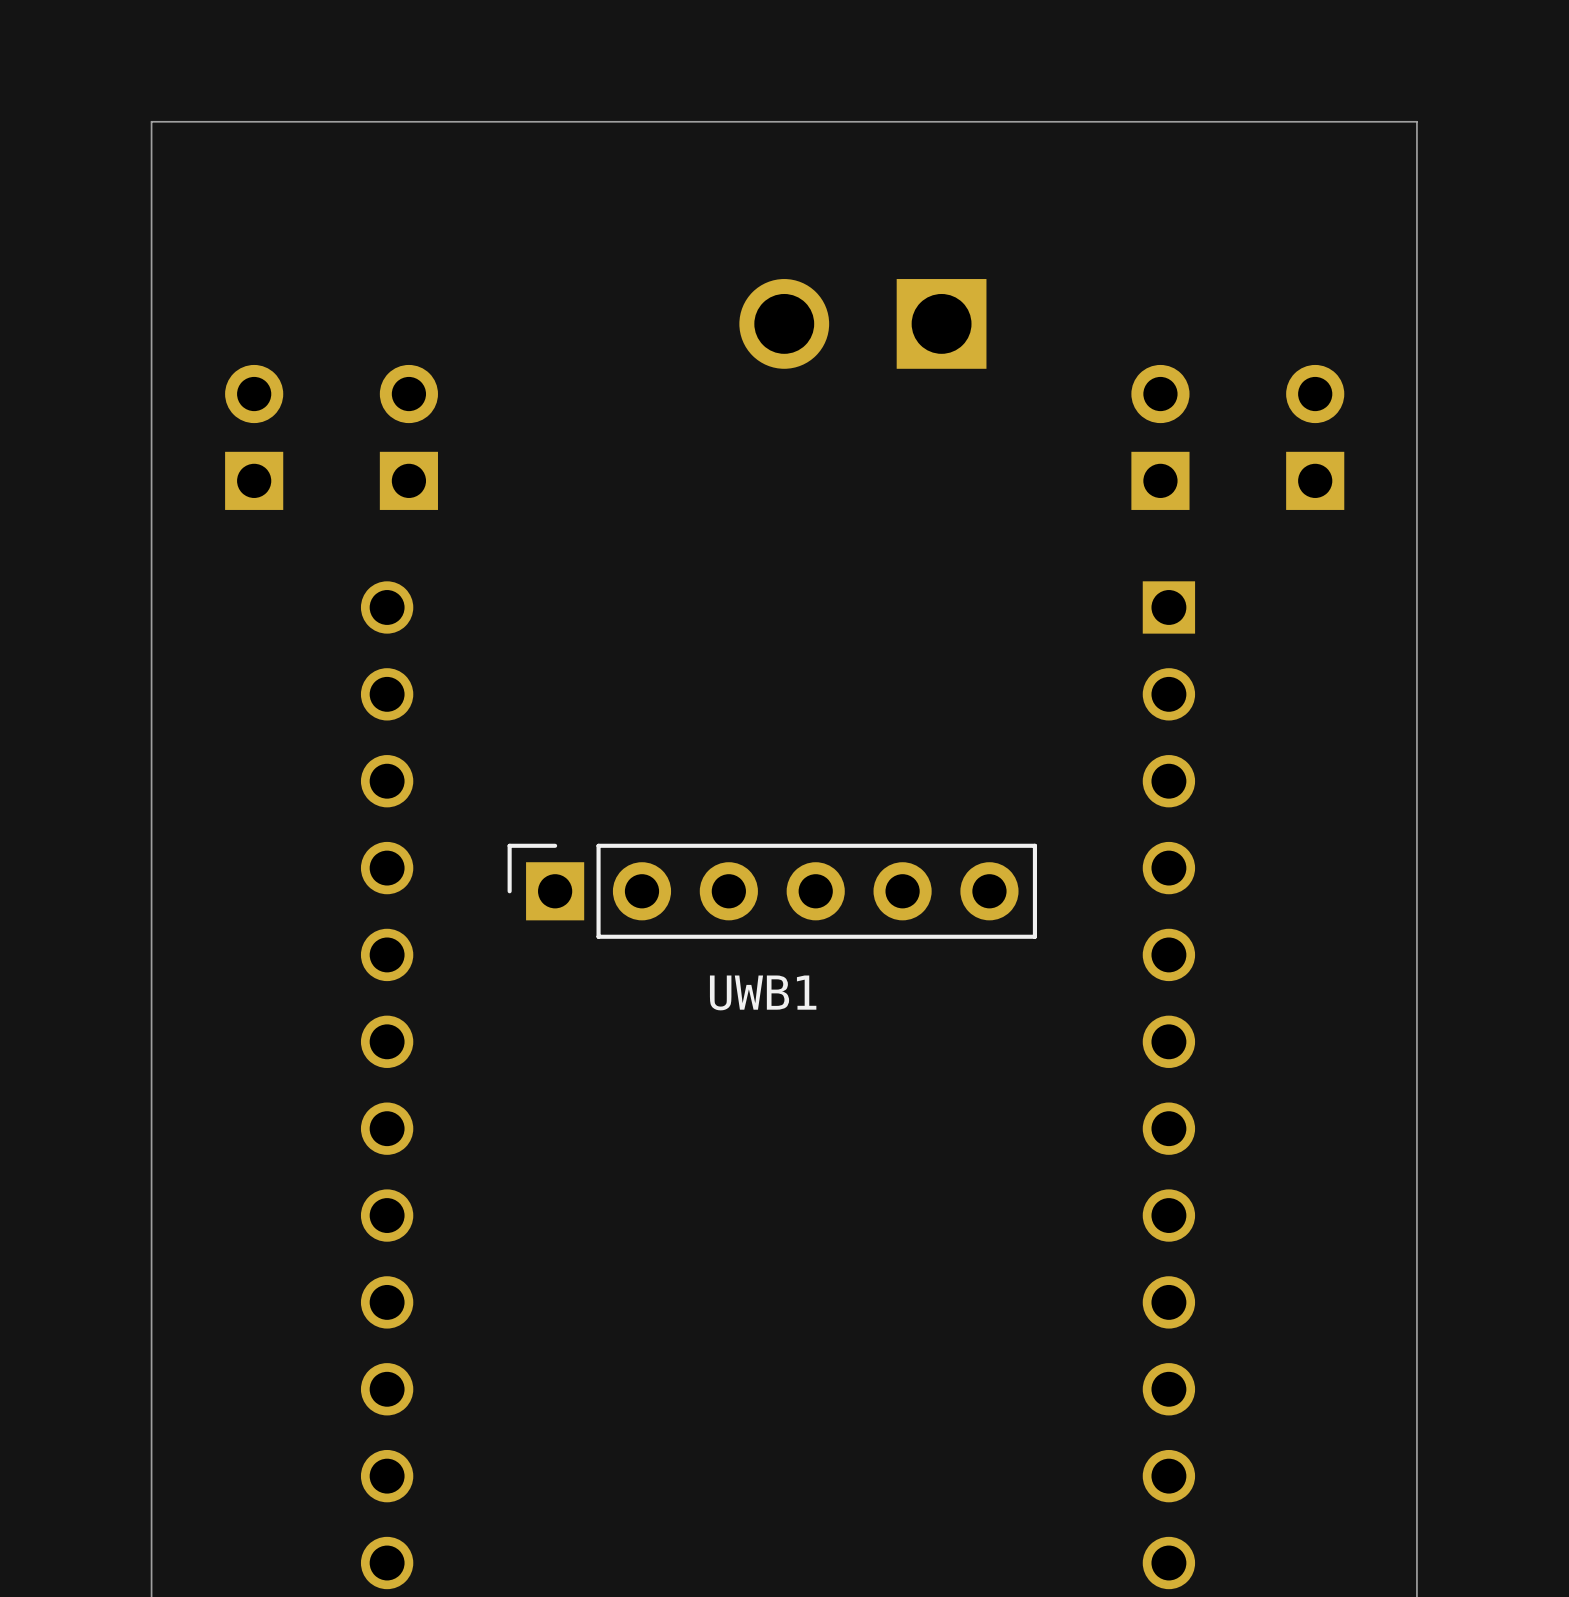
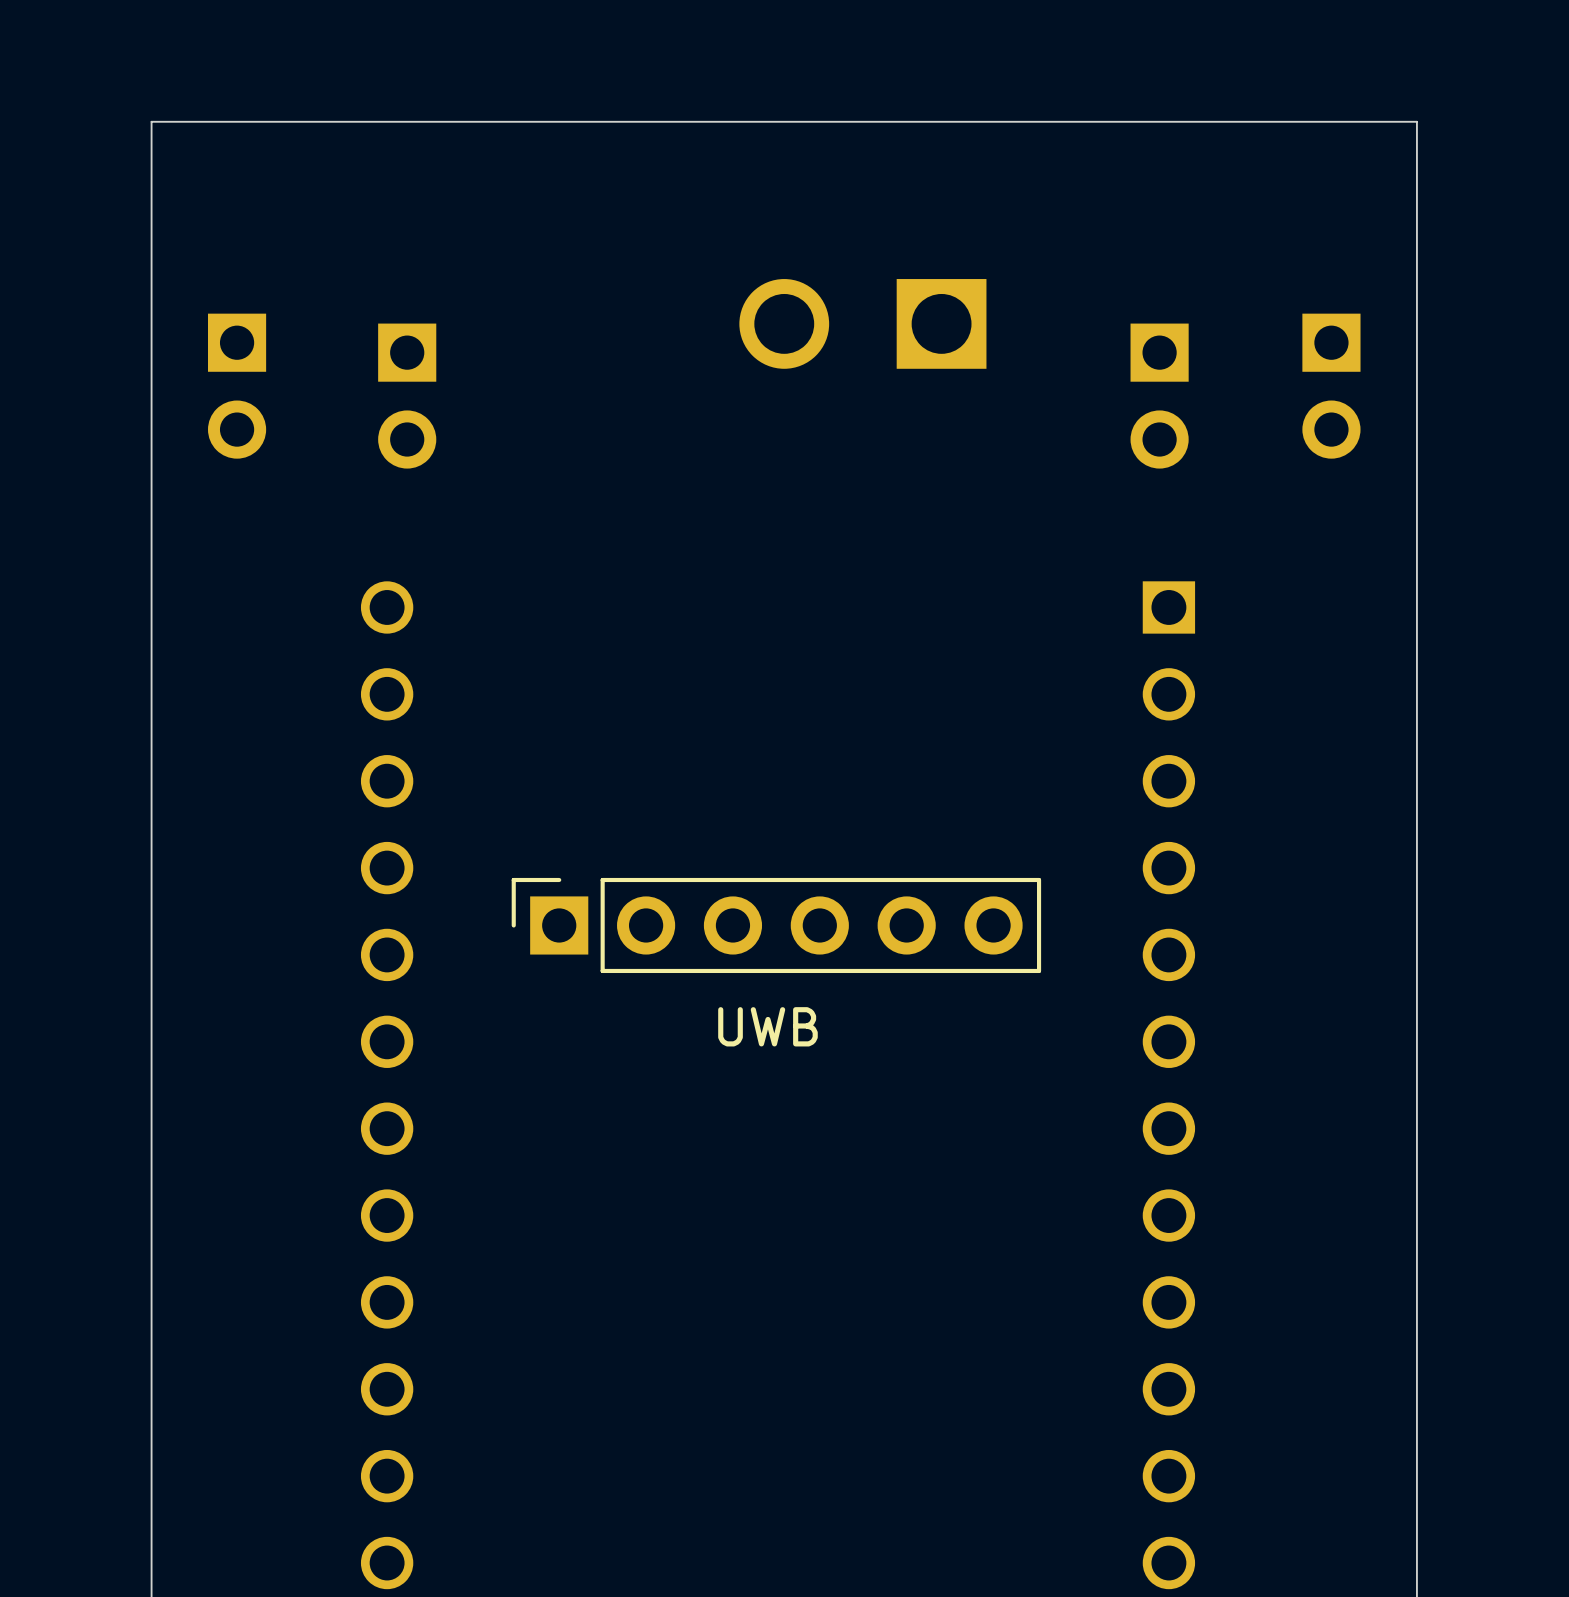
part rotation: 0° (254, 437) -> 180° (237, 386)
part rotation: 0° (408, 437) -> 180° (407, 396)
part rotation: 0° (1160, 437) -> 180° (1159, 396)
part rotation: 0° (1315, 437) -> 180° (1331, 386)
UWB1: (772, 891) -> none
UWB: none -> (776, 925)

